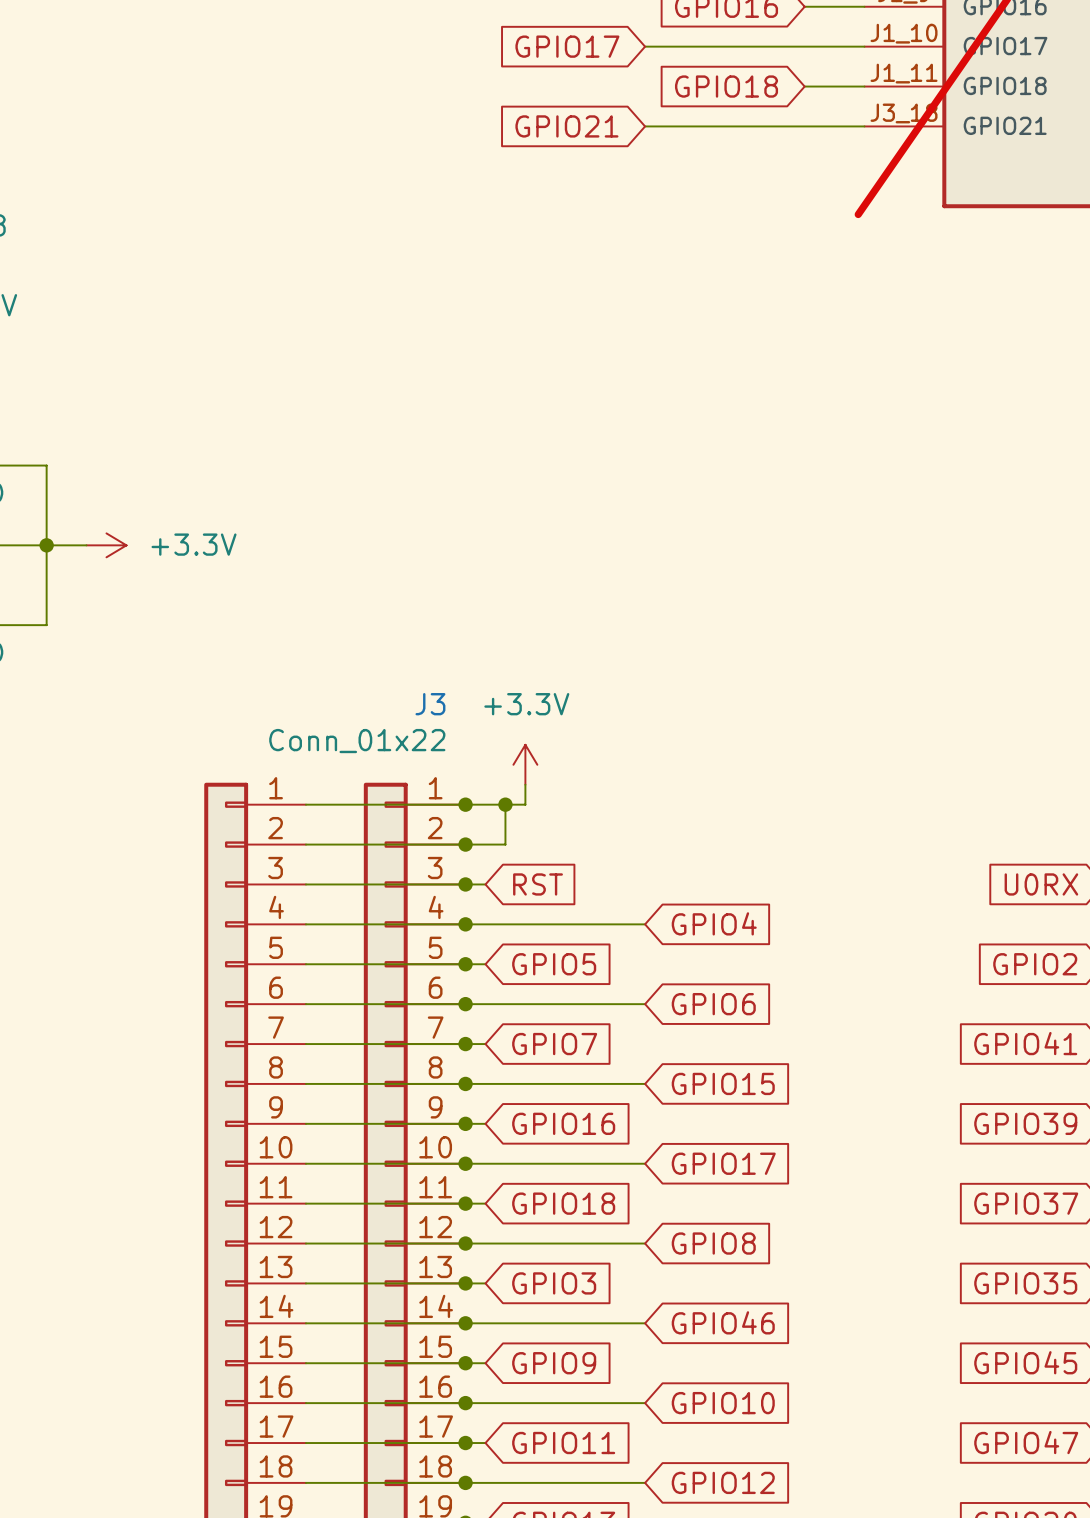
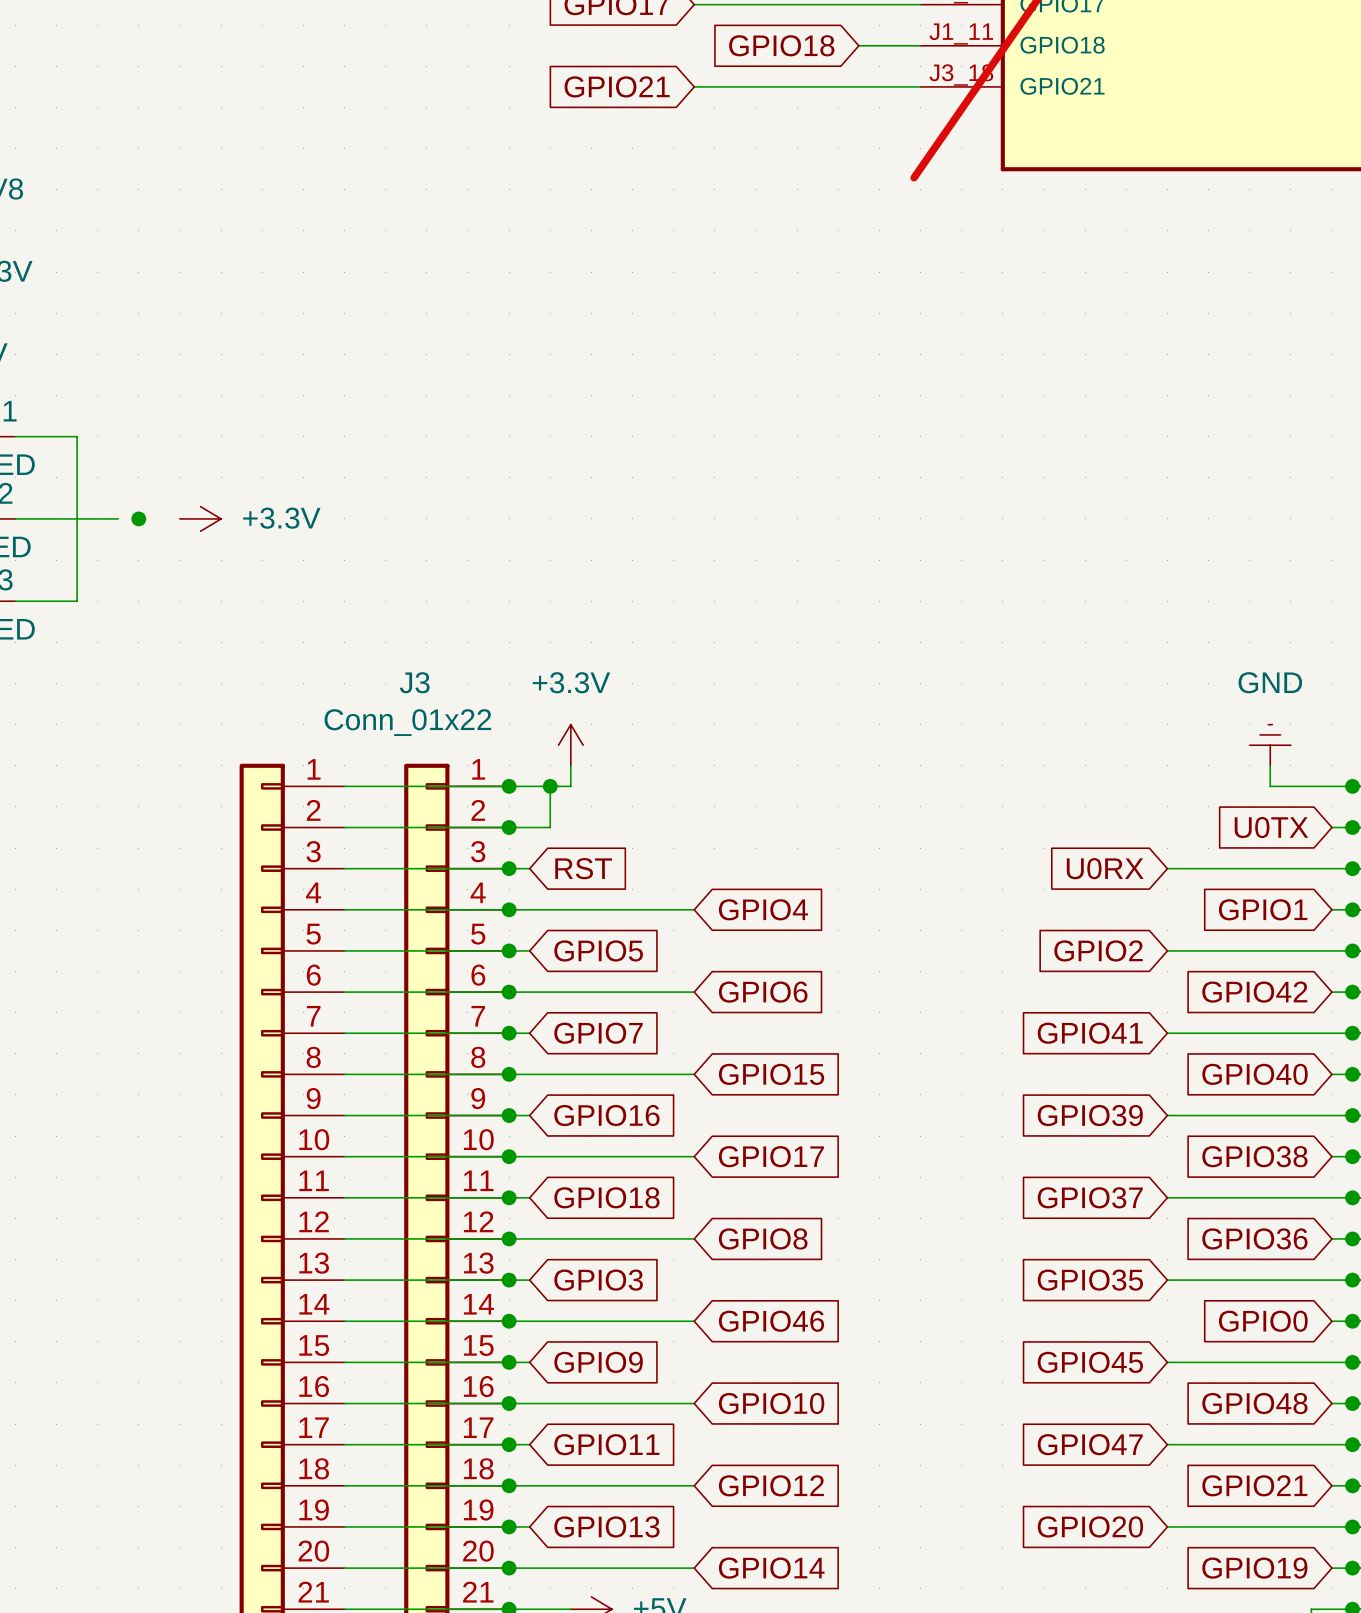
junction position: (46, 545) -> (138, 518)
power symbol position: +3.3V (106, 545) -> +3.3V (200, 518)
J3 name position: J3 (430, 704) -> J3 (414, 682)

